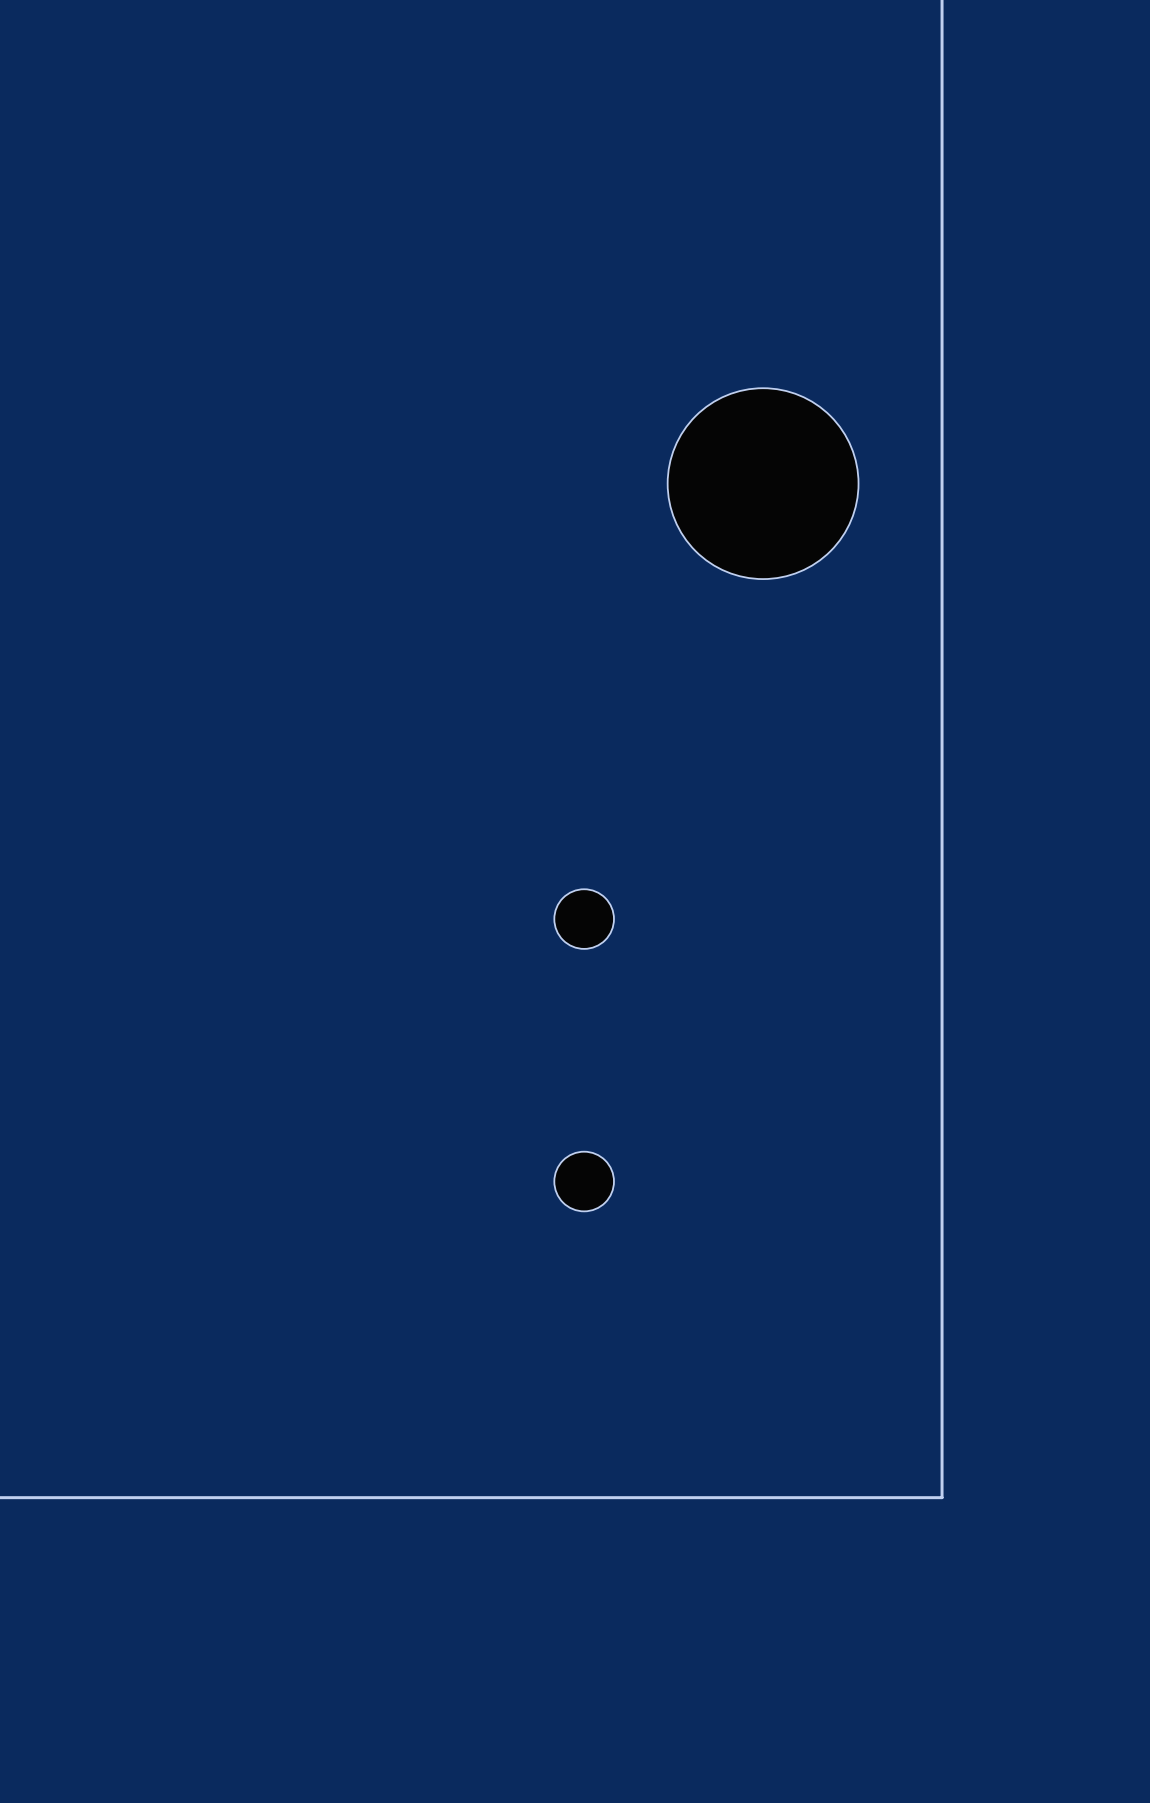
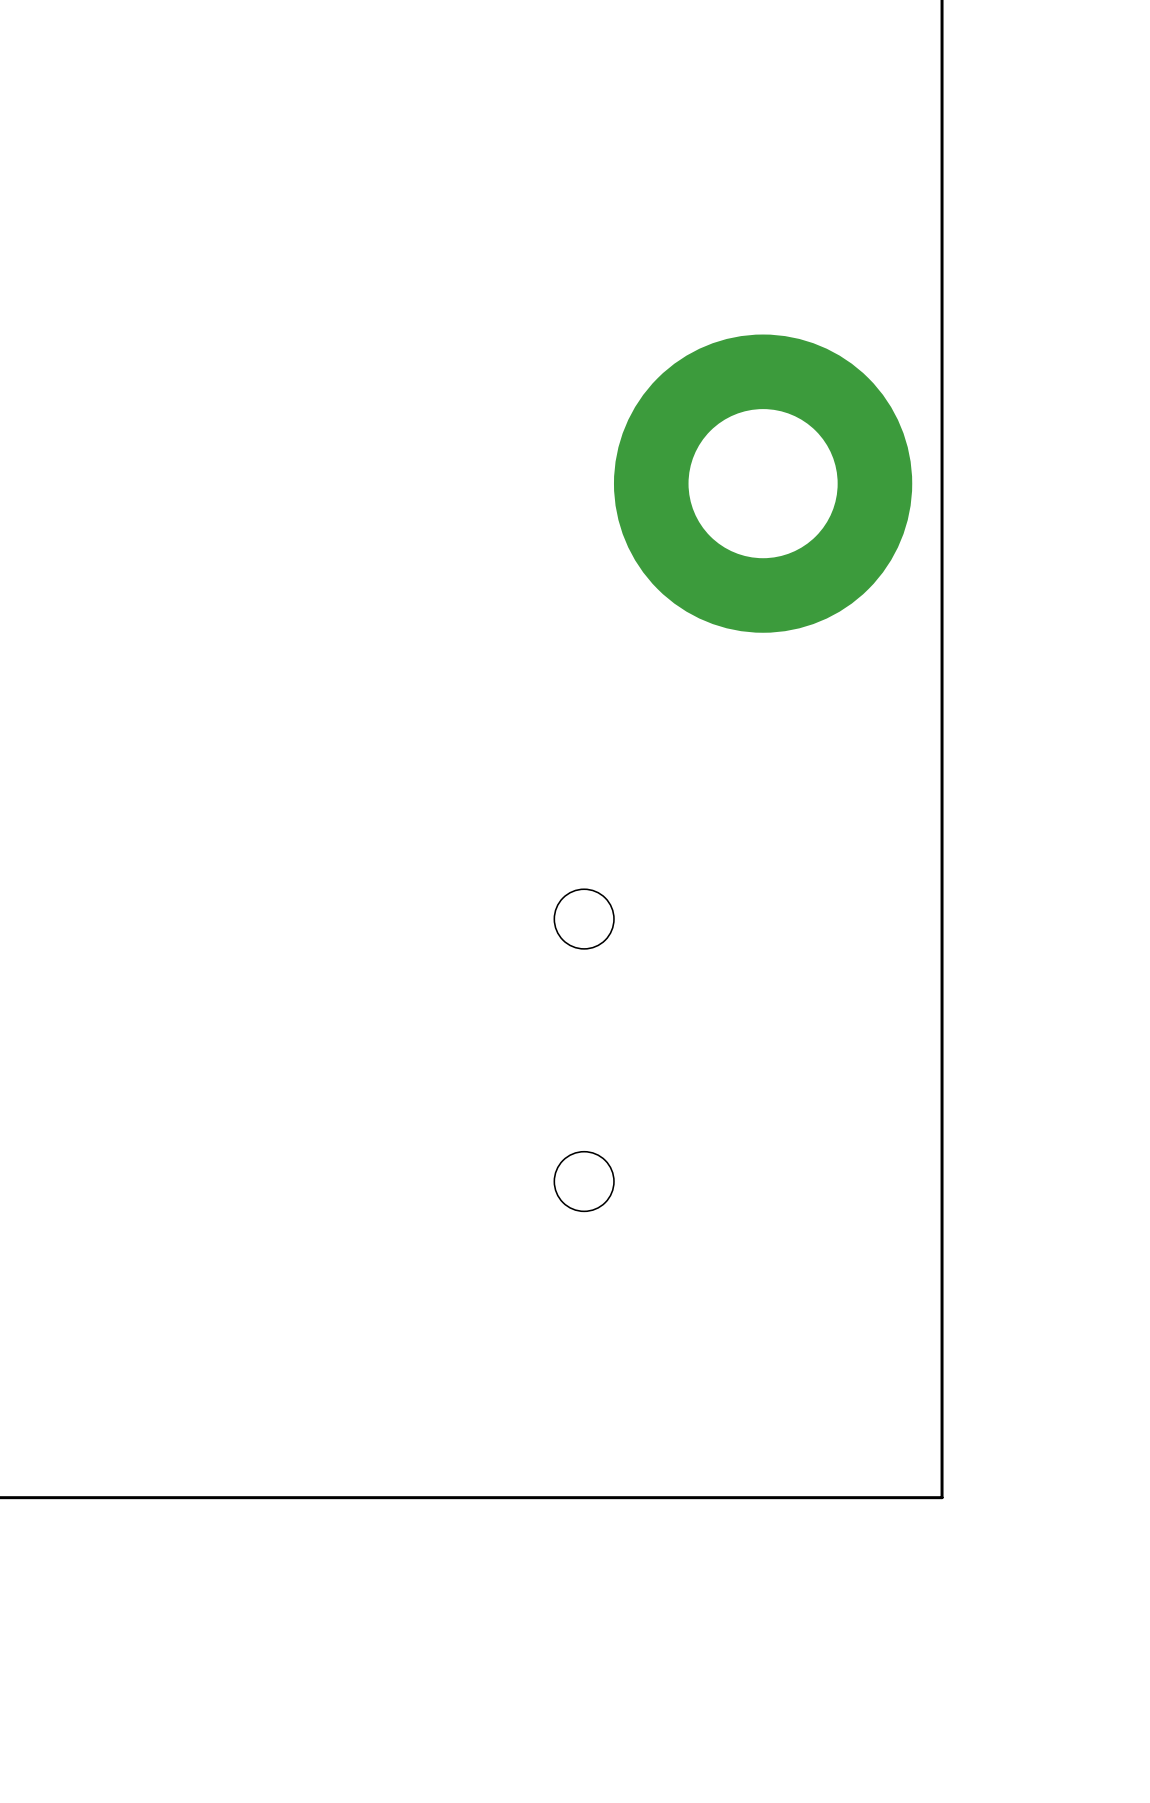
part footprint: [667, 388, 859, 580] -> [613, 334, 913, 633]

